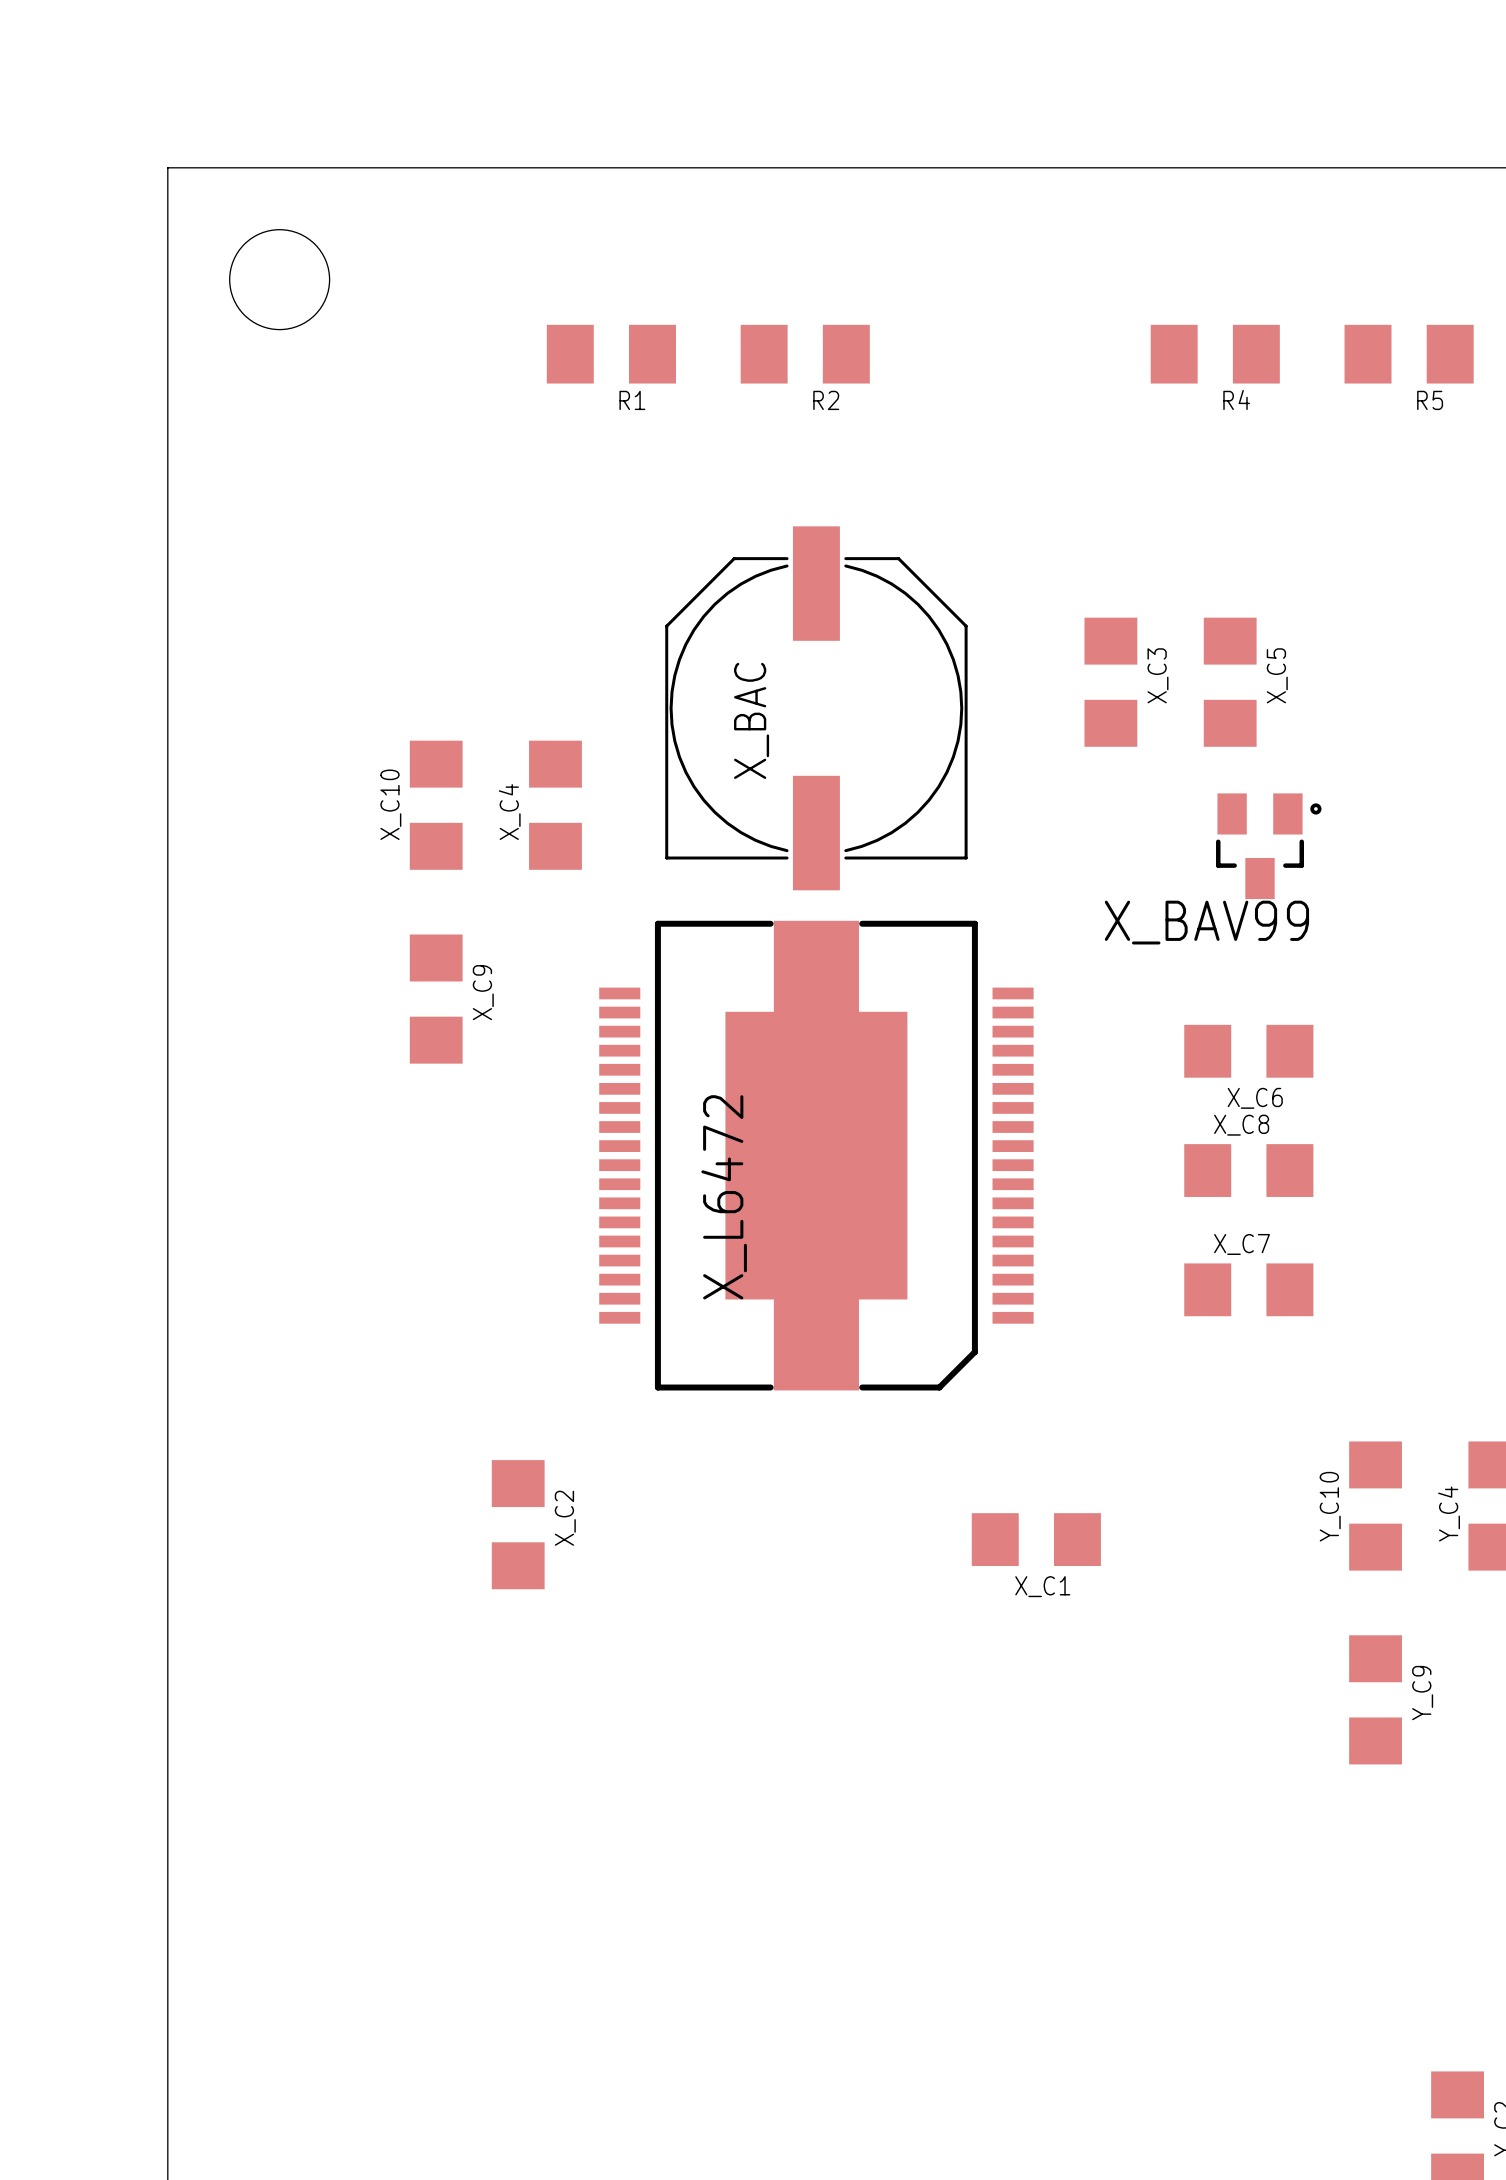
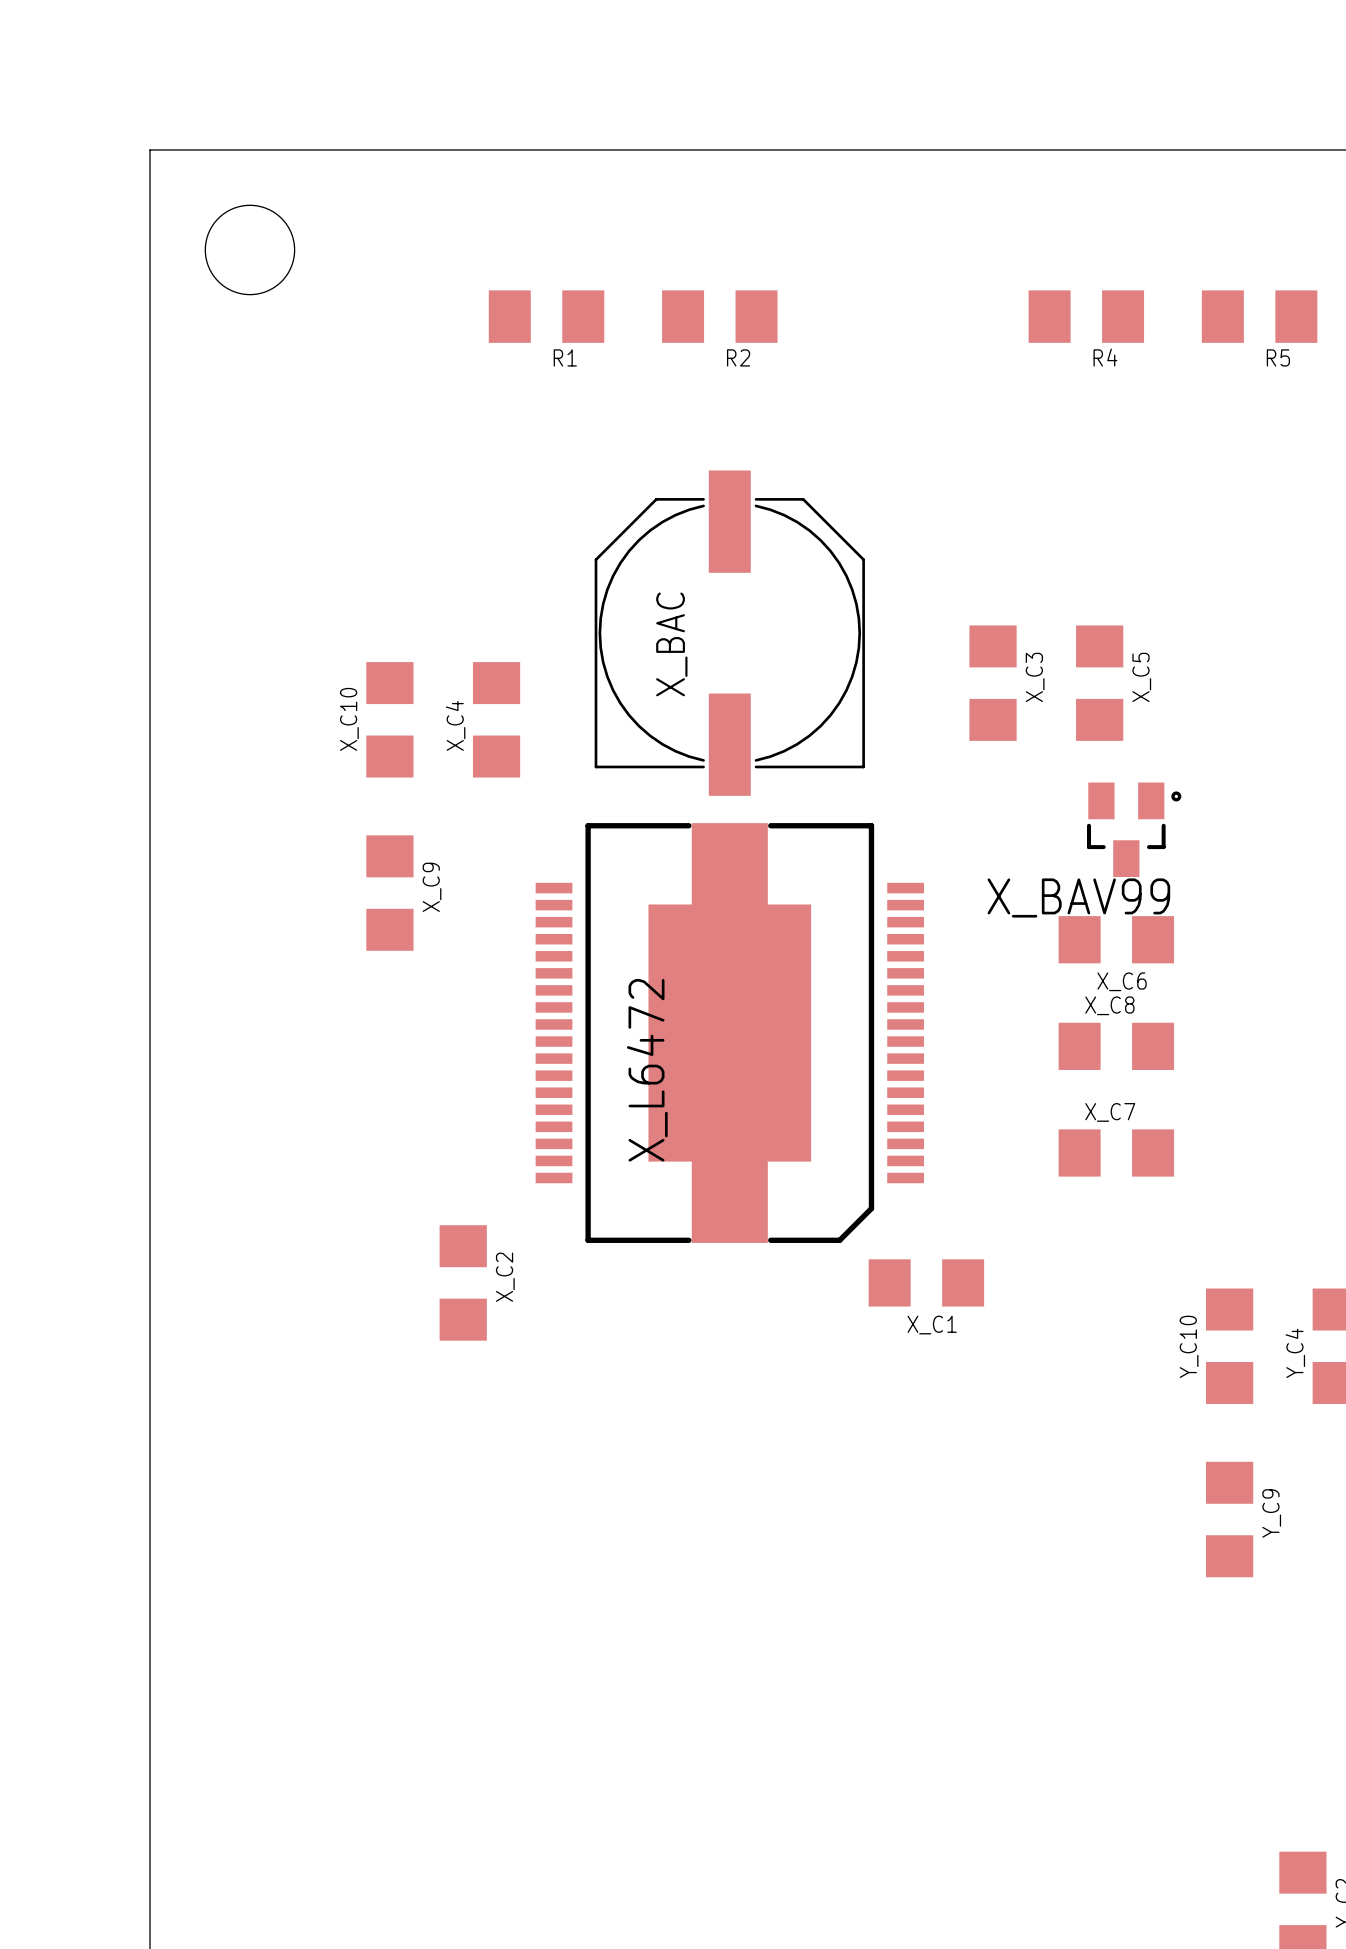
X_C3 position: (1110, 682) -> (993, 683)
X_C5 position: (1230, 682) -> (1099, 683)
X_BAV99 position: (1268, 846) -> (1134, 829)
X_C2 position: (518, 1524) -> (463, 1282)
X_C1 position: (1036, 1539) -> (926, 1282)

